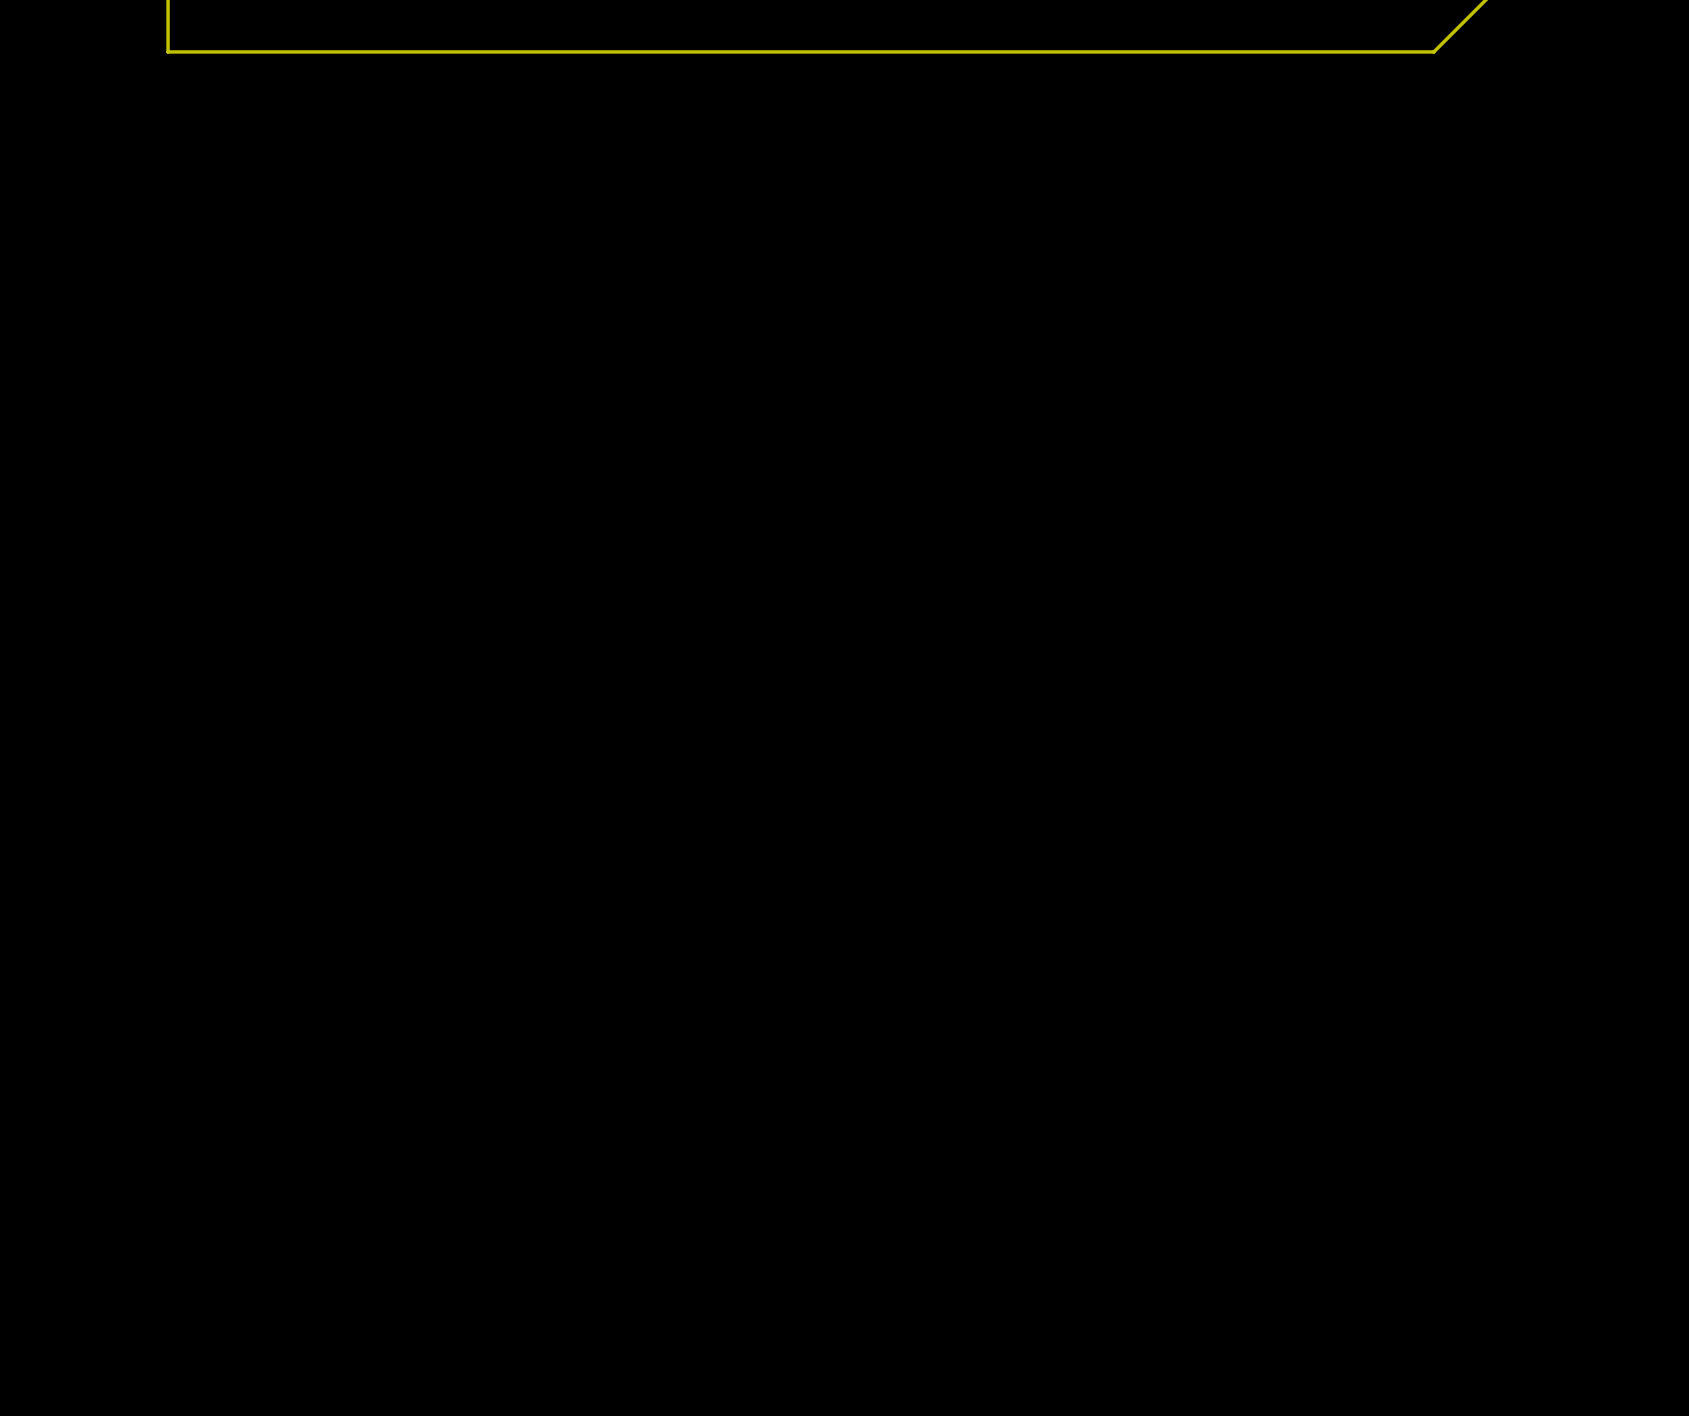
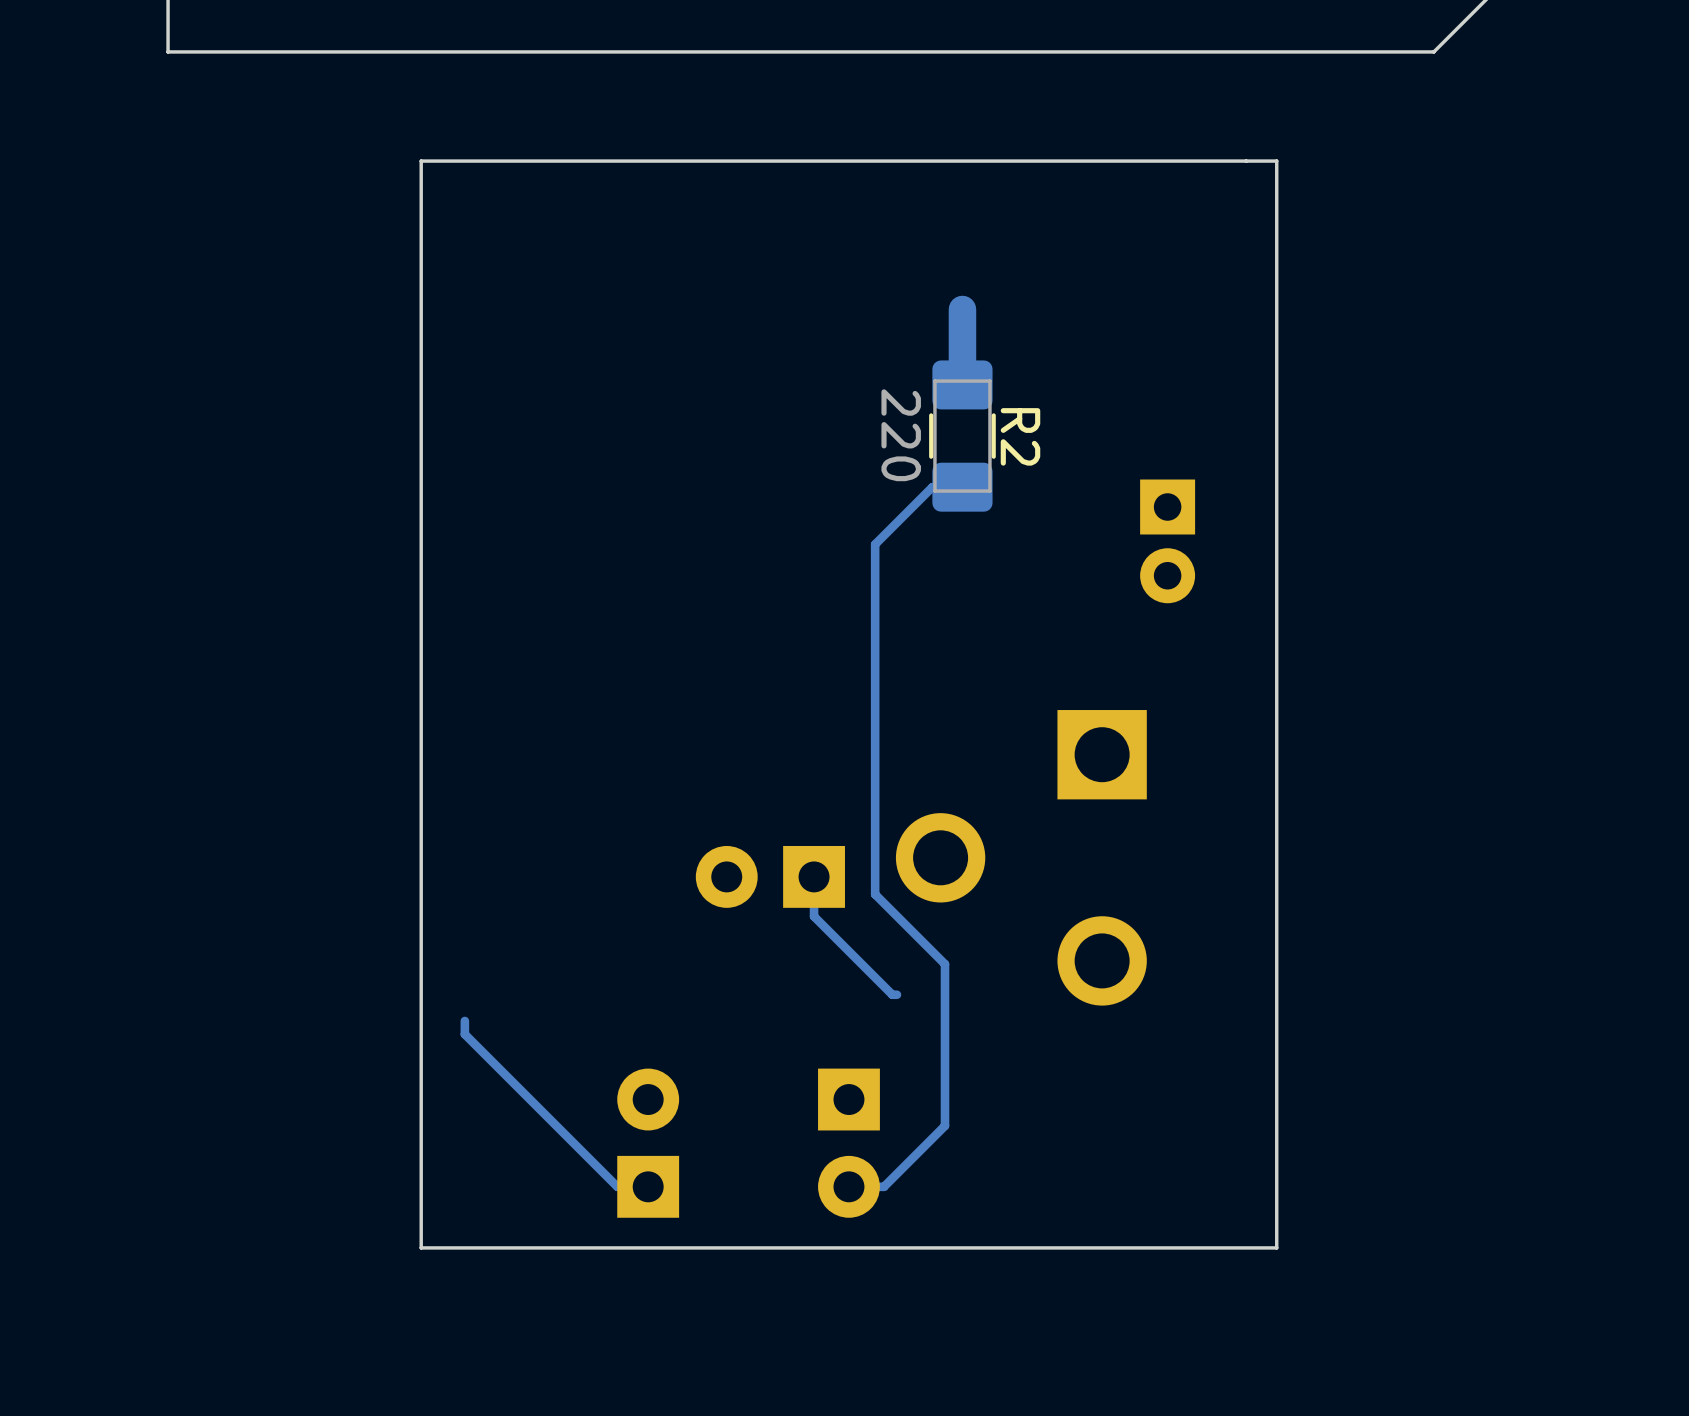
board edge: none -> (1276, 161) (421, 161) (421, 1247) (1276, 1247) (1276, 161)
track: none -> (962, 309) (962, 384)
R2: none -> 220 (962, 436)
track: none -> (962, 487) (932, 487) (875, 544) (875, 894) (945, 964) (945, 1125) (883, 1186) (848, 1186)
part: none -> (1167, 541)
part: none -> (1021, 857)
part: none -> (770, 876)
track: none -> (814, 876) (814, 916) (892, 994) (896, 994)
track: none -> (464, 1020) (464, 1034) (617, 1186) (648, 1186)
part: none -> (648, 1143)
part: none -> (848, 1143)

